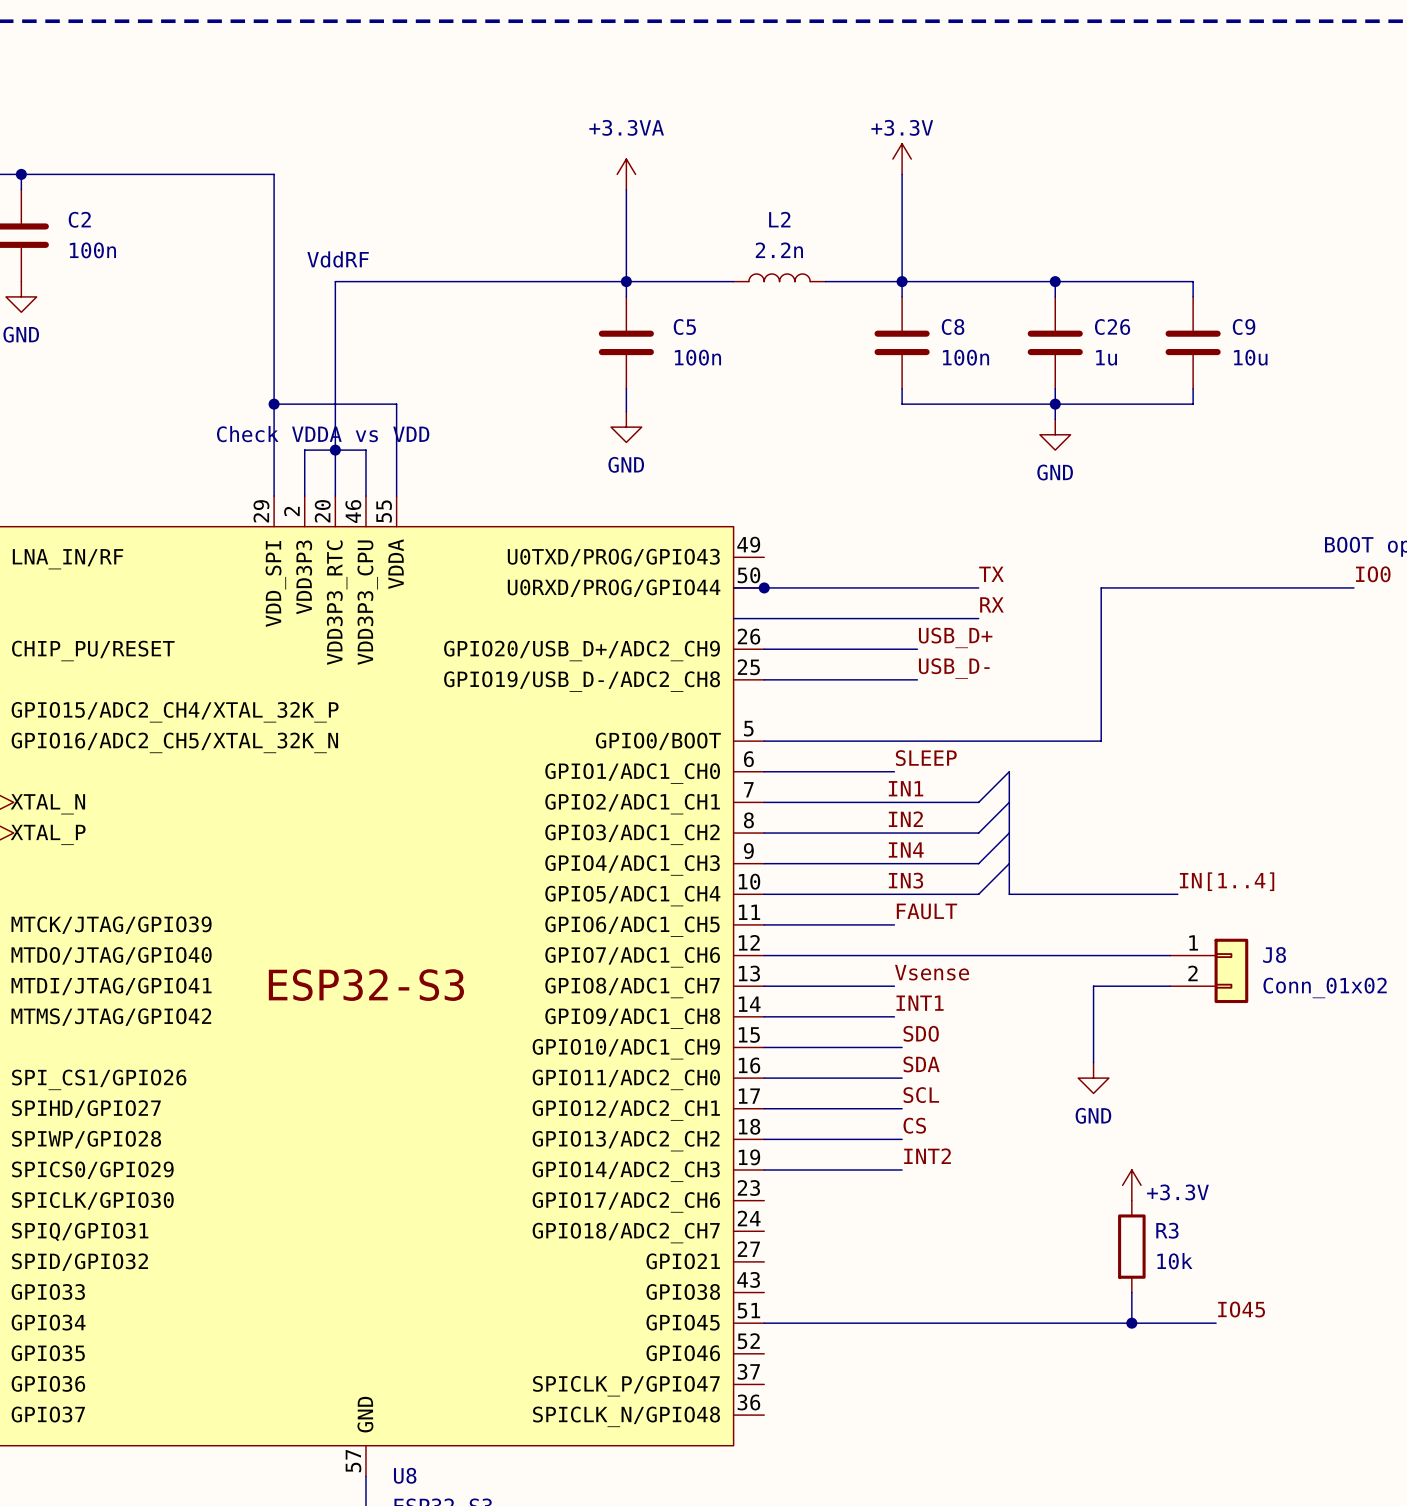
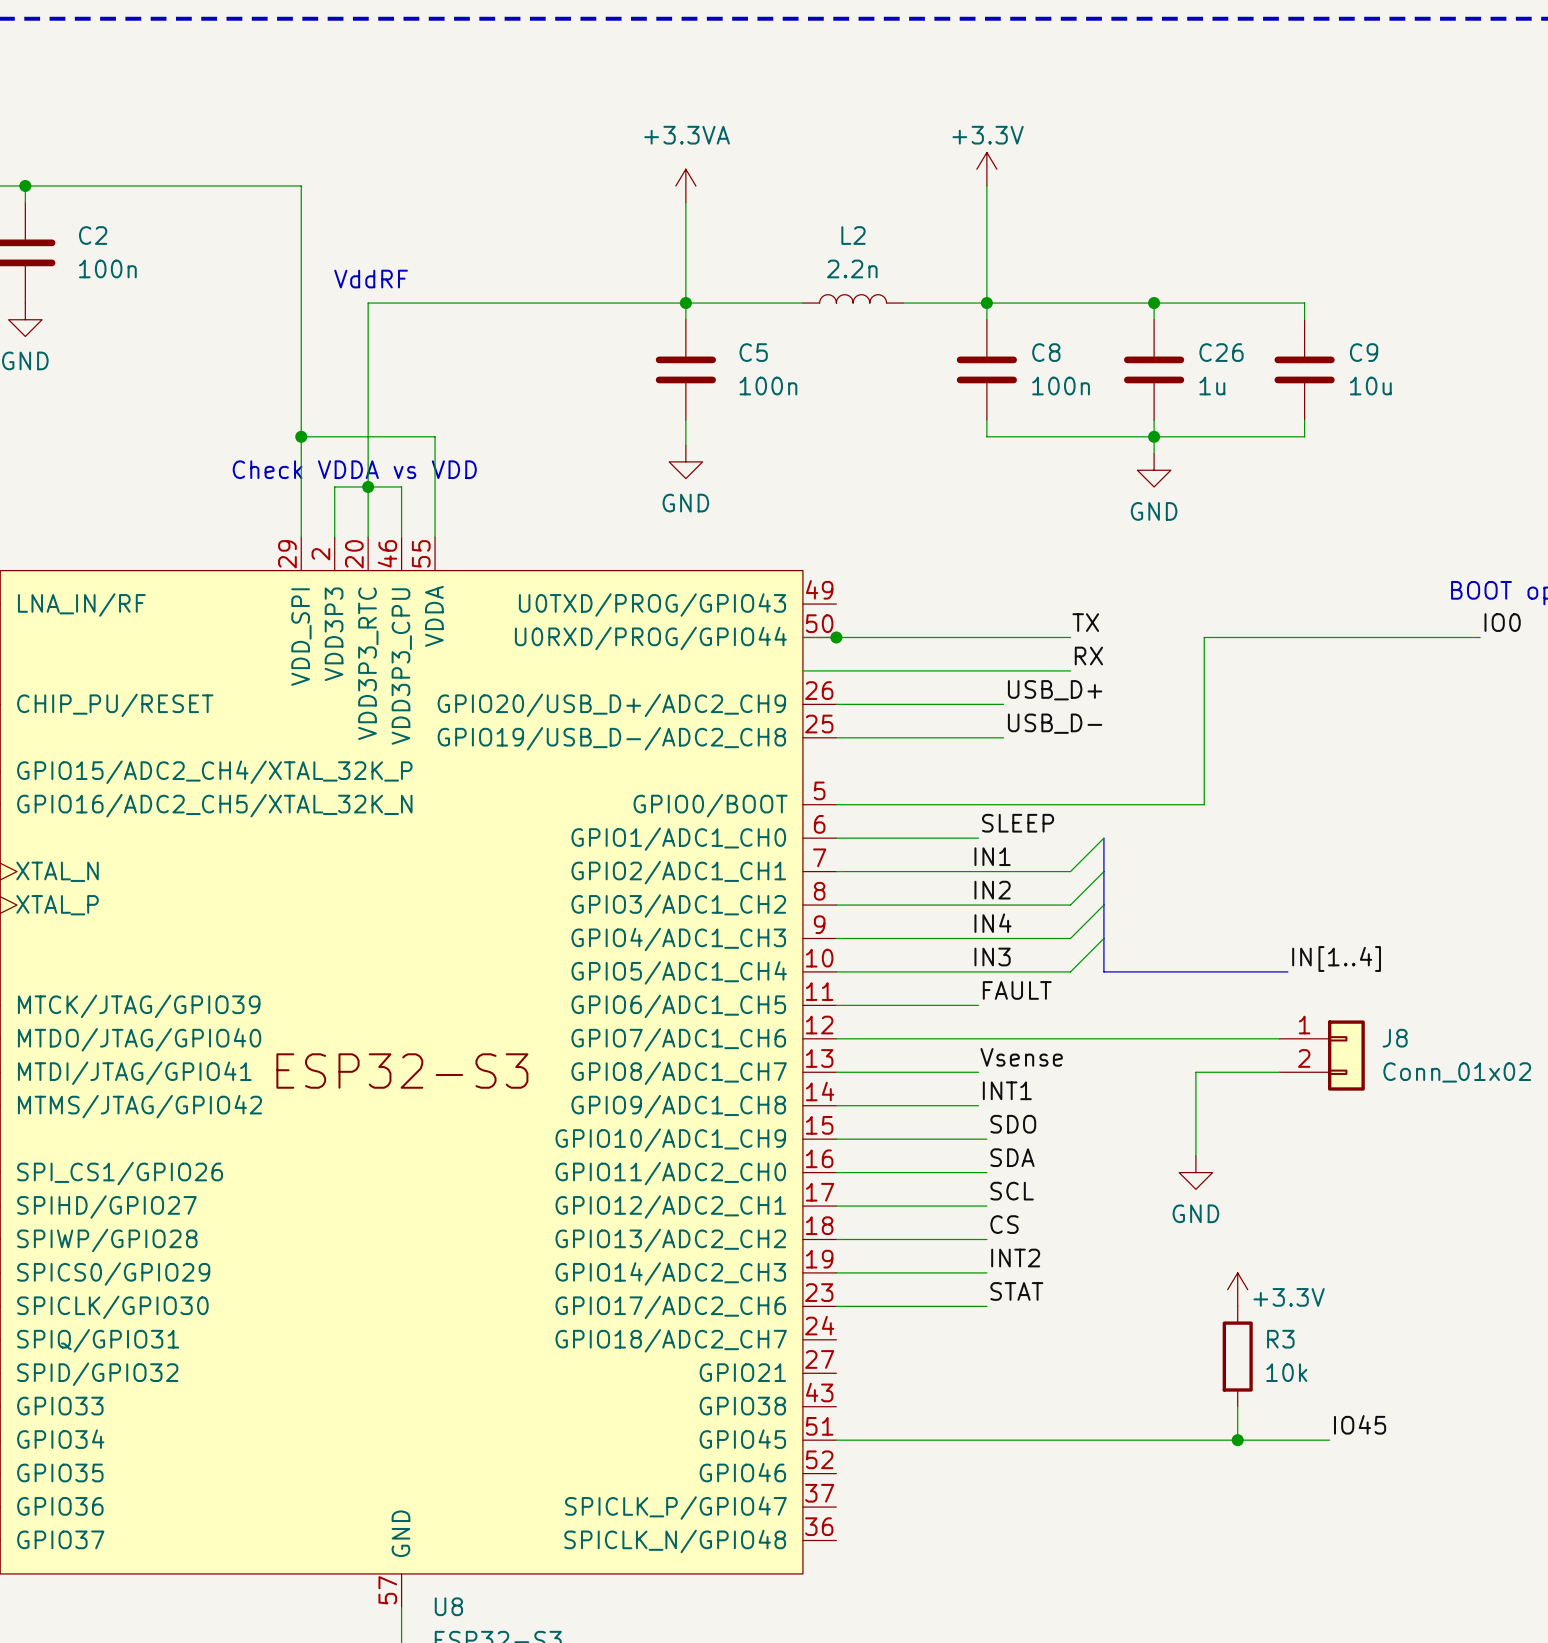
label: none -> STAT (1016, 1291)
wire: none -> (836, 1306) (986, 1306)

